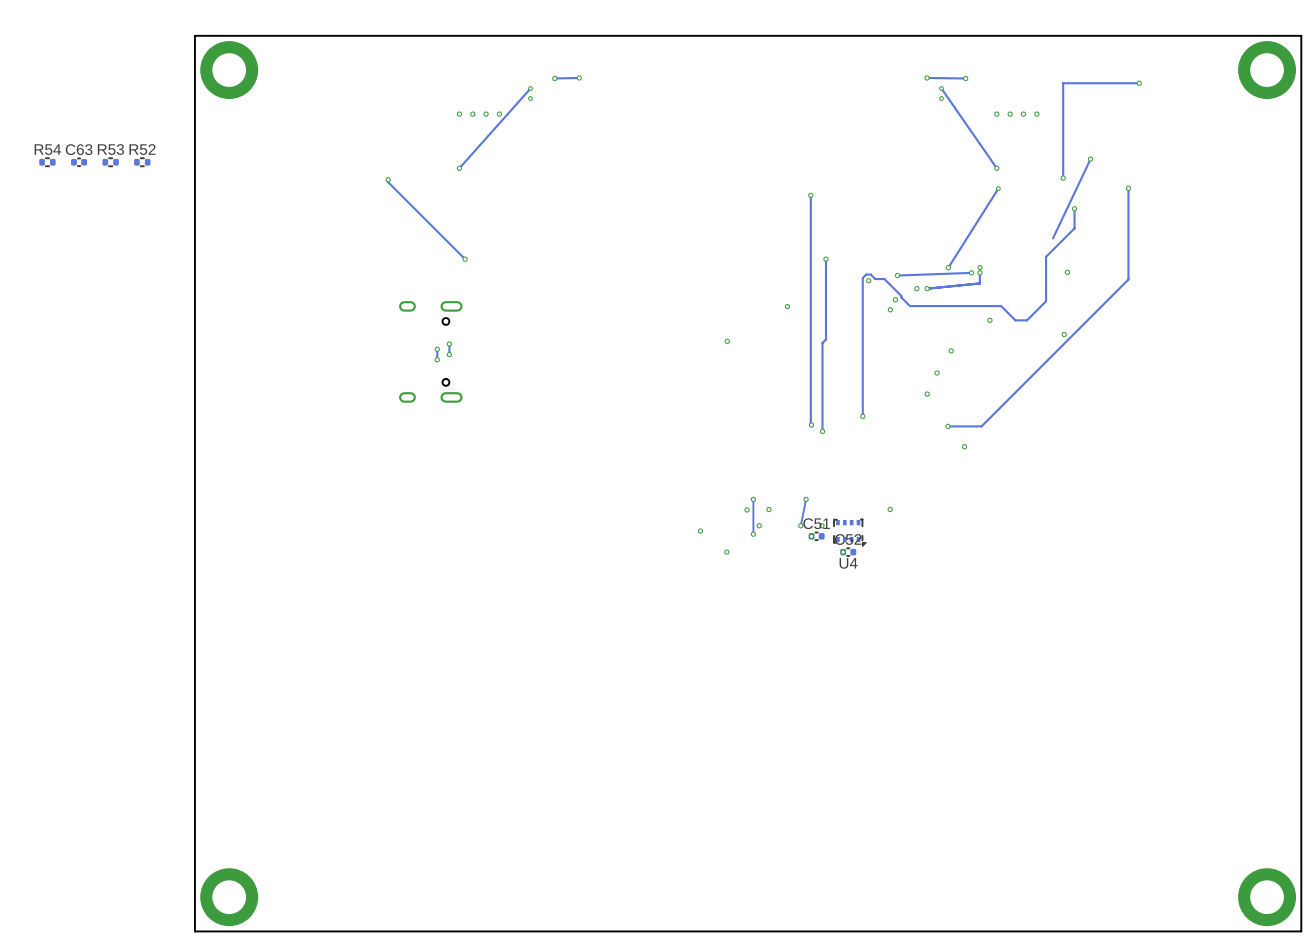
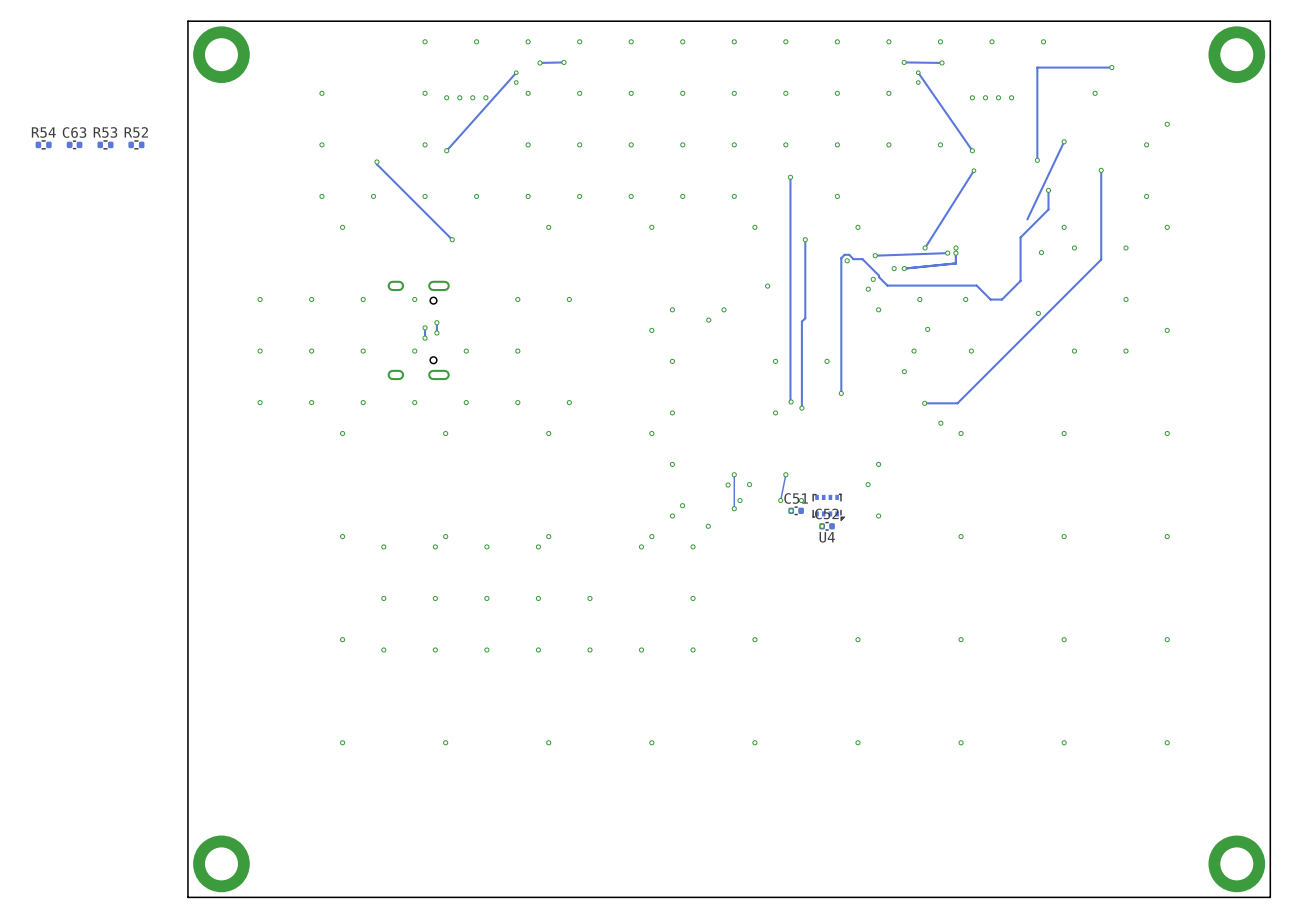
via: none -> (425, 41)
via: none -> (476, 41)
via: none -> (528, 41)
via: none -> (579, 41)
via: none -> (631, 41)
via: none -> (682, 41)
via: none -> (734, 41)
via: none -> (785, 41)
via: none -> (837, 41)
via: none -> (888, 41)
via: none -> (940, 41)
via: none -> (991, 41)
via: none -> (1043, 41)
via: none -> (321, 93)
via: none -> (425, 93)
via: none -> (528, 93)
via: none -> (579, 93)
via: none -> (631, 93)
via: none -> (682, 93)
via: none -> (734, 93)
via: none -> (785, 93)
via: none -> (837, 93)
via: none -> (888, 93)
via: none -> (1095, 93)
via: none -> (1167, 124)
via: none -> (321, 144)
via: none -> (425, 144)
via: none -> (528, 144)
via: none -> (579, 144)
via: none -> (631, 144)
via: none -> (682, 144)
via: none -> (734, 144)
via: none -> (785, 144)
via: none -> (837, 144)
via: none -> (888, 144)
via: none -> (940, 144)
via: none -> (1146, 144)
via: none -> (321, 196)
via: none -> (373, 196)
via: none -> (425, 196)
via: none -> (476, 196)
via: none -> (528, 196)
via: none -> (579, 196)
via: none -> (631, 196)
via: none -> (682, 196)
via: none -> (734, 196)
via: none -> (837, 196)
via: none -> (1146, 196)
via: none -> (342, 227)
via: none -> (548, 227)
via: none -> (651, 227)
via: none -> (754, 227)
via: none -> (857, 227)
via: none -> (1064, 227)
via: none -> (1167, 227)
via: none -> (1074, 247)
via: none -> (1125, 247)
via: none -> (260, 299)
via: none -> (311, 299)
via: none -> (363, 299)
via: none -> (414, 299)
via: none -> (517, 299)
via: none -> (569, 299)
via: none -> (919, 299)
via: none -> (1125, 299)
via: none -> (672, 309)
via: none -> (723, 309)
via: none -> (878, 309)
via: none -> (651, 330)
via: none -> (1167, 330)
via: none -> (260, 351)
via: none -> (311, 351)
via: none -> (363, 351)
via: none -> (414, 351)
via: none -> (466, 351)
via: none -> (517, 351)
via: none -> (971, 351)
via: none -> (1074, 351)
via: none -> (1125, 351)
via: none -> (672, 361)
via: none -> (775, 361)
via: none -> (827, 361)
via: none -> (260, 402)
via: none -> (311, 402)
via: none -> (363, 402)
via: none -> (414, 402)
via: none -> (466, 402)
via: none -> (517, 402)
via: none -> (569, 402)
via: none -> (672, 412)
via: none -> (775, 412)
via: none -> (342, 433)
via: none -> (445, 433)
via: none -> (548, 433)
via: none -> (651, 433)
via: none -> (961, 433)
via: none -> (1064, 433)
via: none -> (1167, 433)
via: none -> (672, 464)
via: none -> (878, 464)
via: none -> (672, 515)
via: none -> (878, 515)
via: none -> (342, 536)
via: none -> (445, 536)
via: none -> (548, 536)
via: none -> (651, 536)
via: none -> (961, 536)
via: none -> (1064, 536)
via: none -> (1167, 536)
via: none -> (383, 546)
via: none -> (435, 546)
via: none -> (486, 546)
via: none -> (538, 546)
via: none -> (641, 546)
via: none -> (693, 546)
via: none -> (383, 598)
via: none -> (435, 598)
via: none -> (486, 598)
via: none -> (538, 598)
via: none -> (589, 598)
via: none -> (693, 598)
via: none -> (342, 639)
via: none -> (754, 639)
via: none -> (857, 639)
via: none -> (961, 639)
via: none -> (1064, 639)
via: none -> (1167, 639)
via: none -> (383, 649)
via: none -> (435, 649)
via: none -> (486, 649)
via: none -> (538, 649)
via: none -> (589, 649)
via: none -> (641, 649)
via: none -> (693, 649)
via: none -> (342, 742)
via: none -> (445, 742)
via: none -> (548, 742)
via: none -> (651, 742)
via: none -> (754, 742)
via: none -> (857, 742)
via: none -> (961, 742)
via: none -> (1064, 742)
via: none -> (1167, 742)

